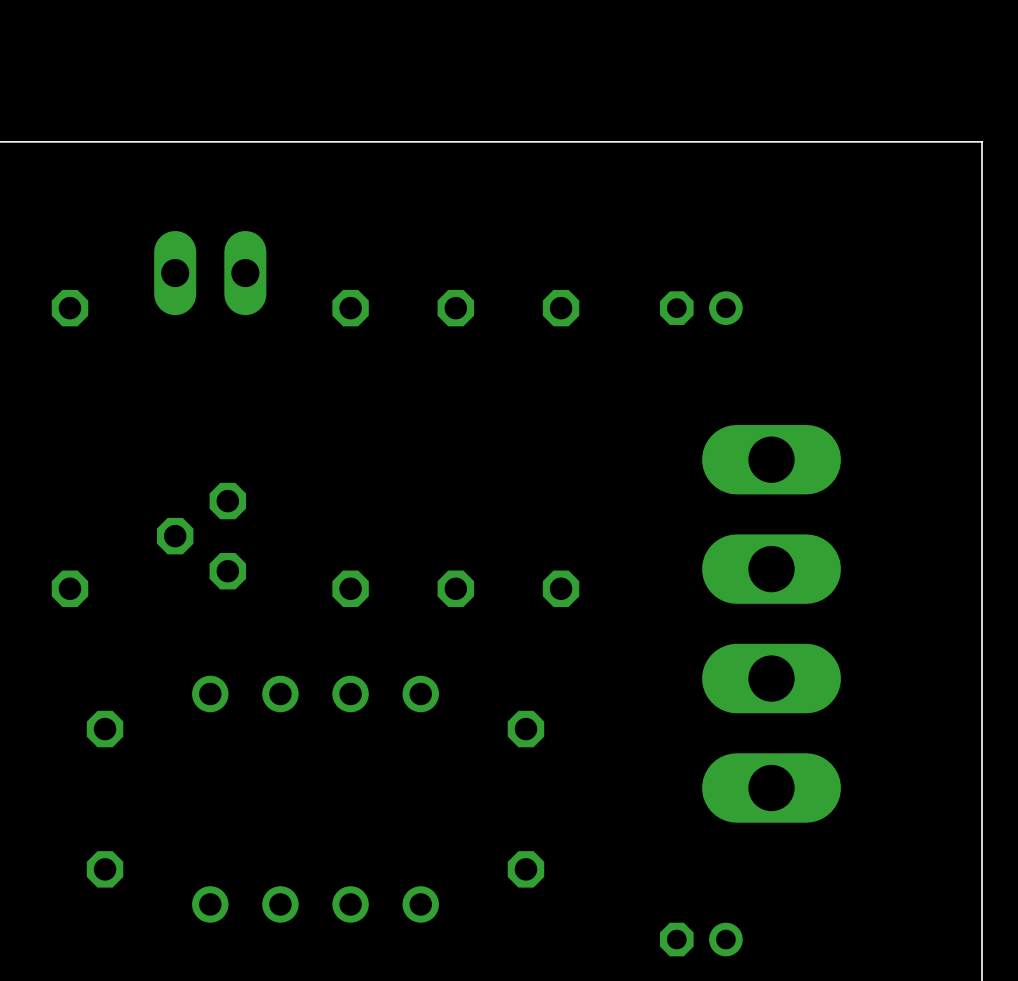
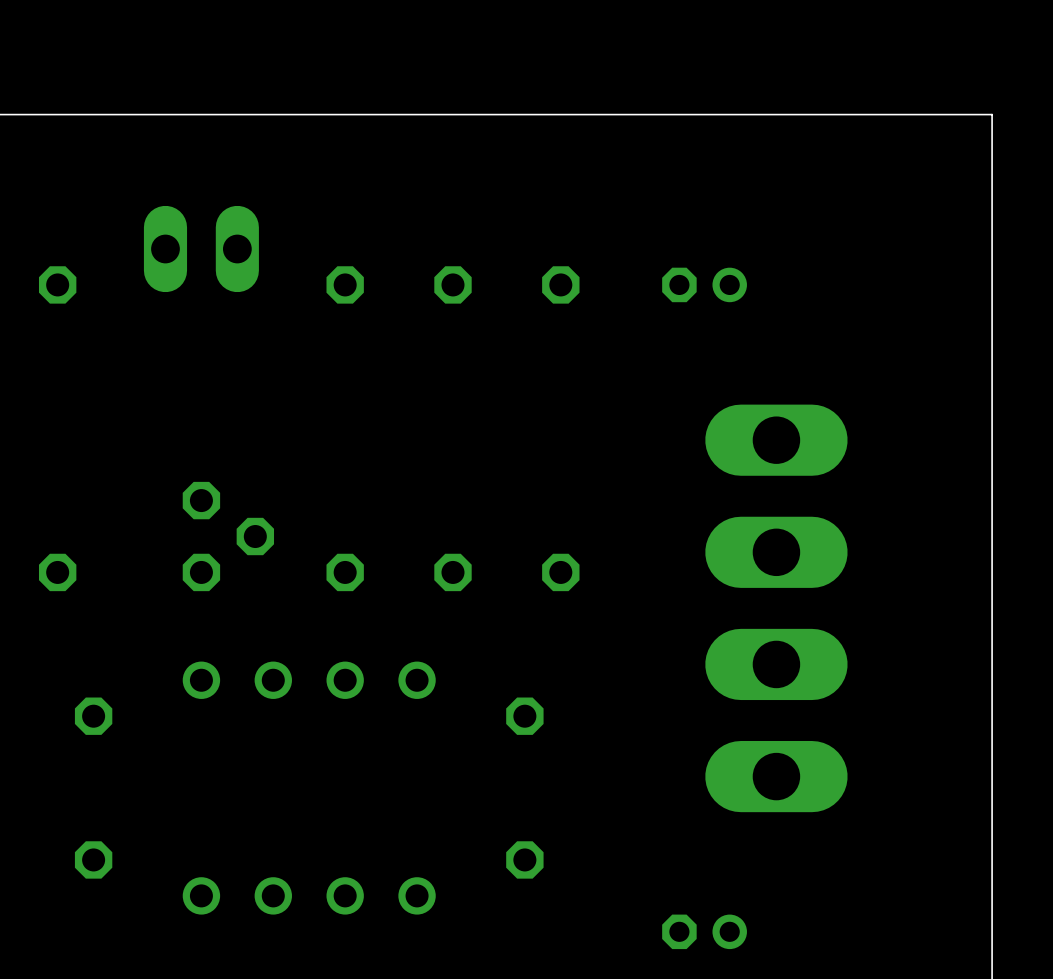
part rotation: 0° (201, 536) -> 180° (228, 536)

